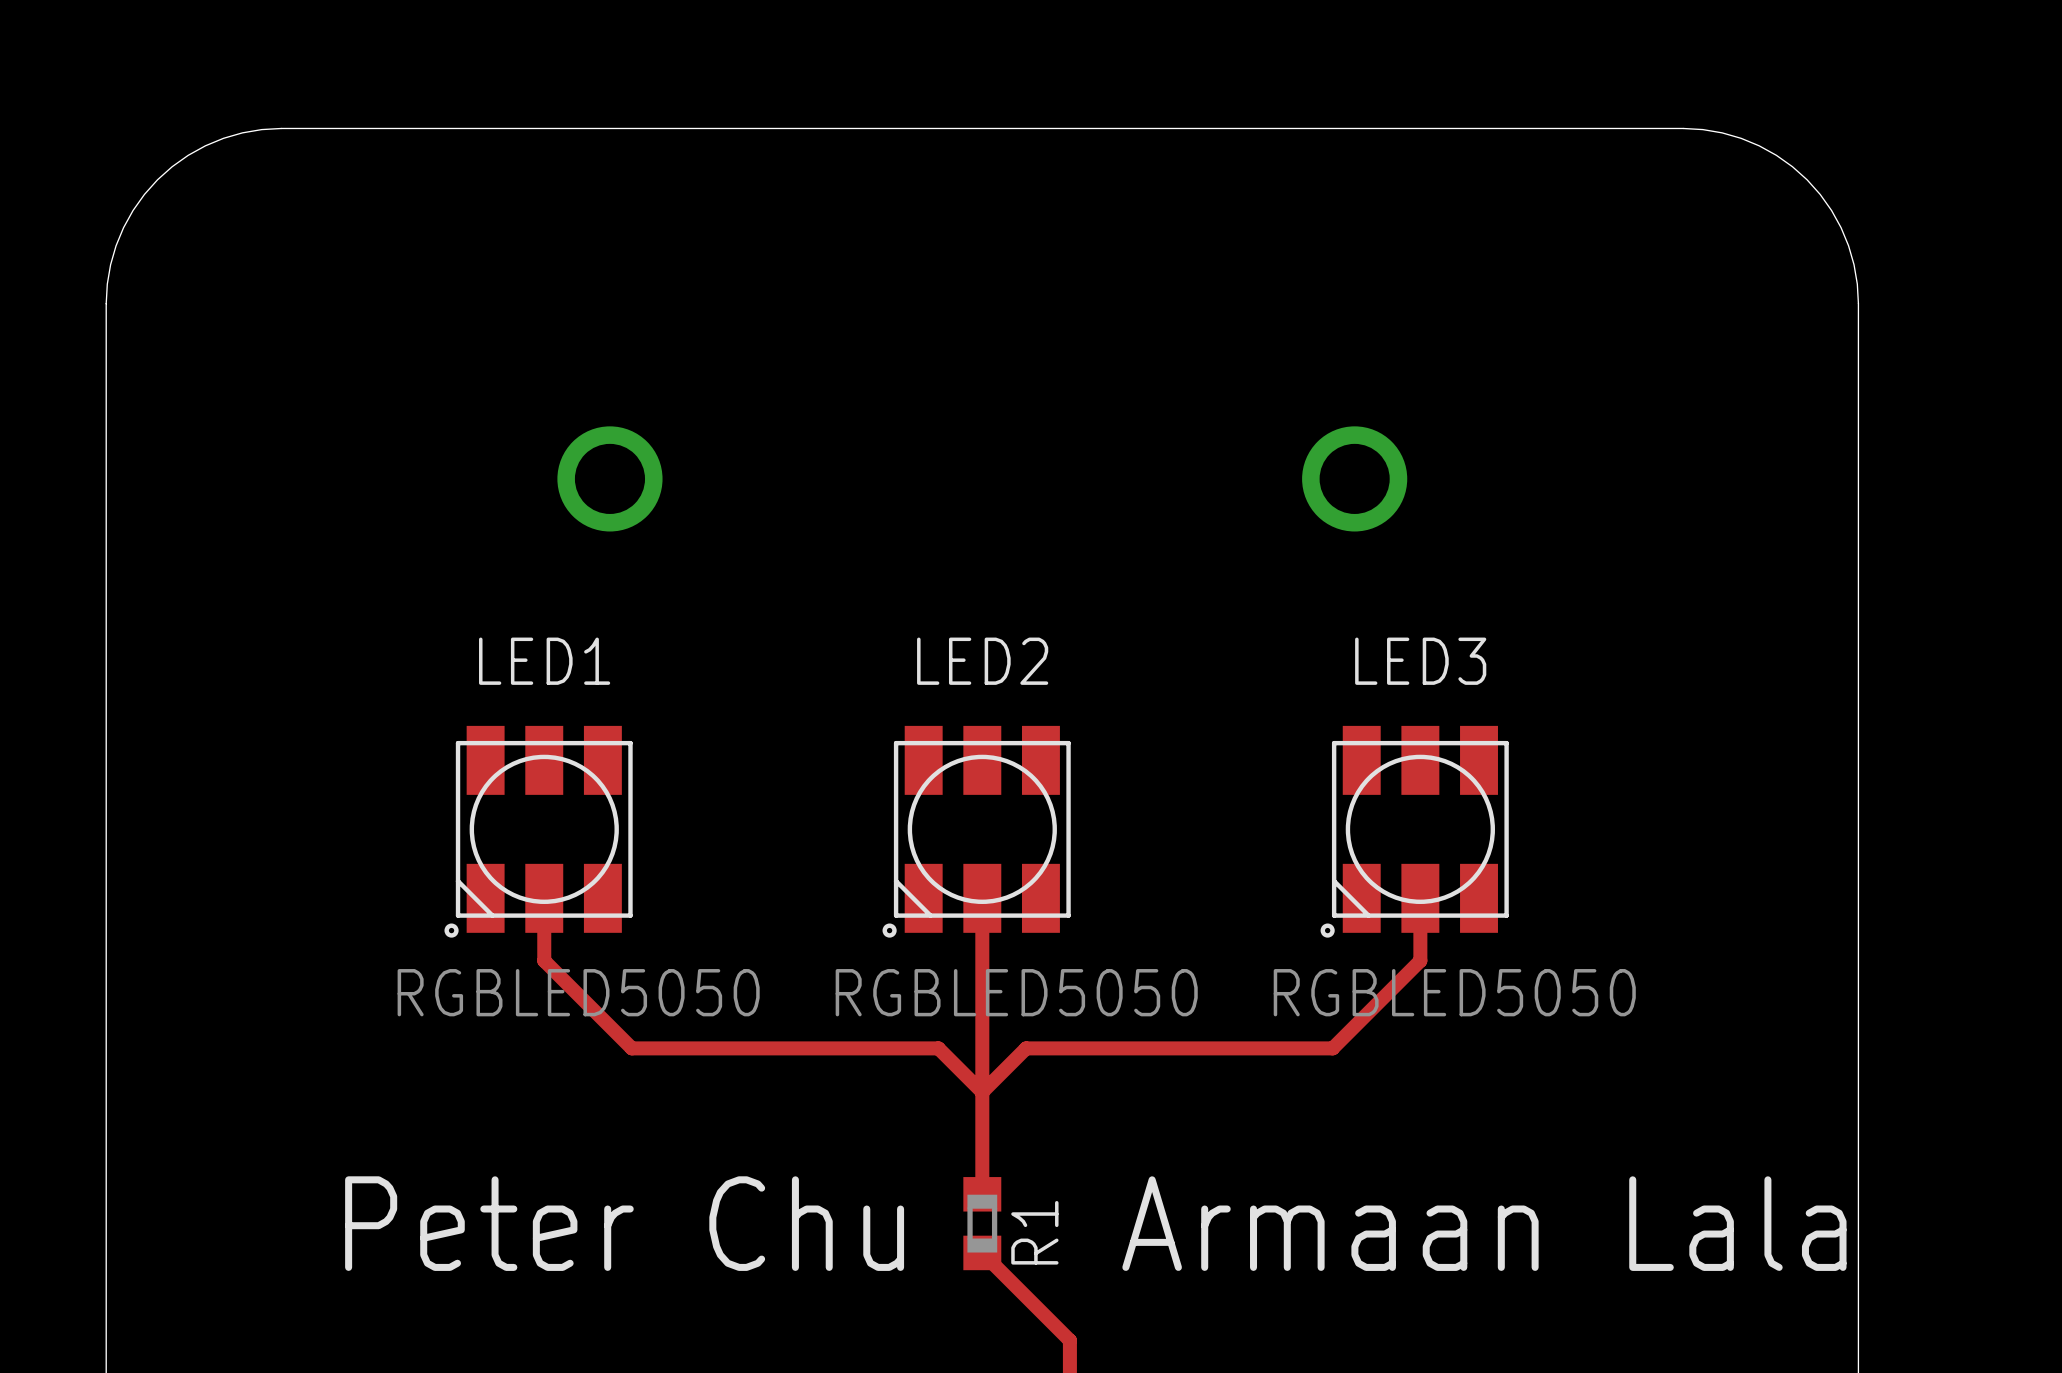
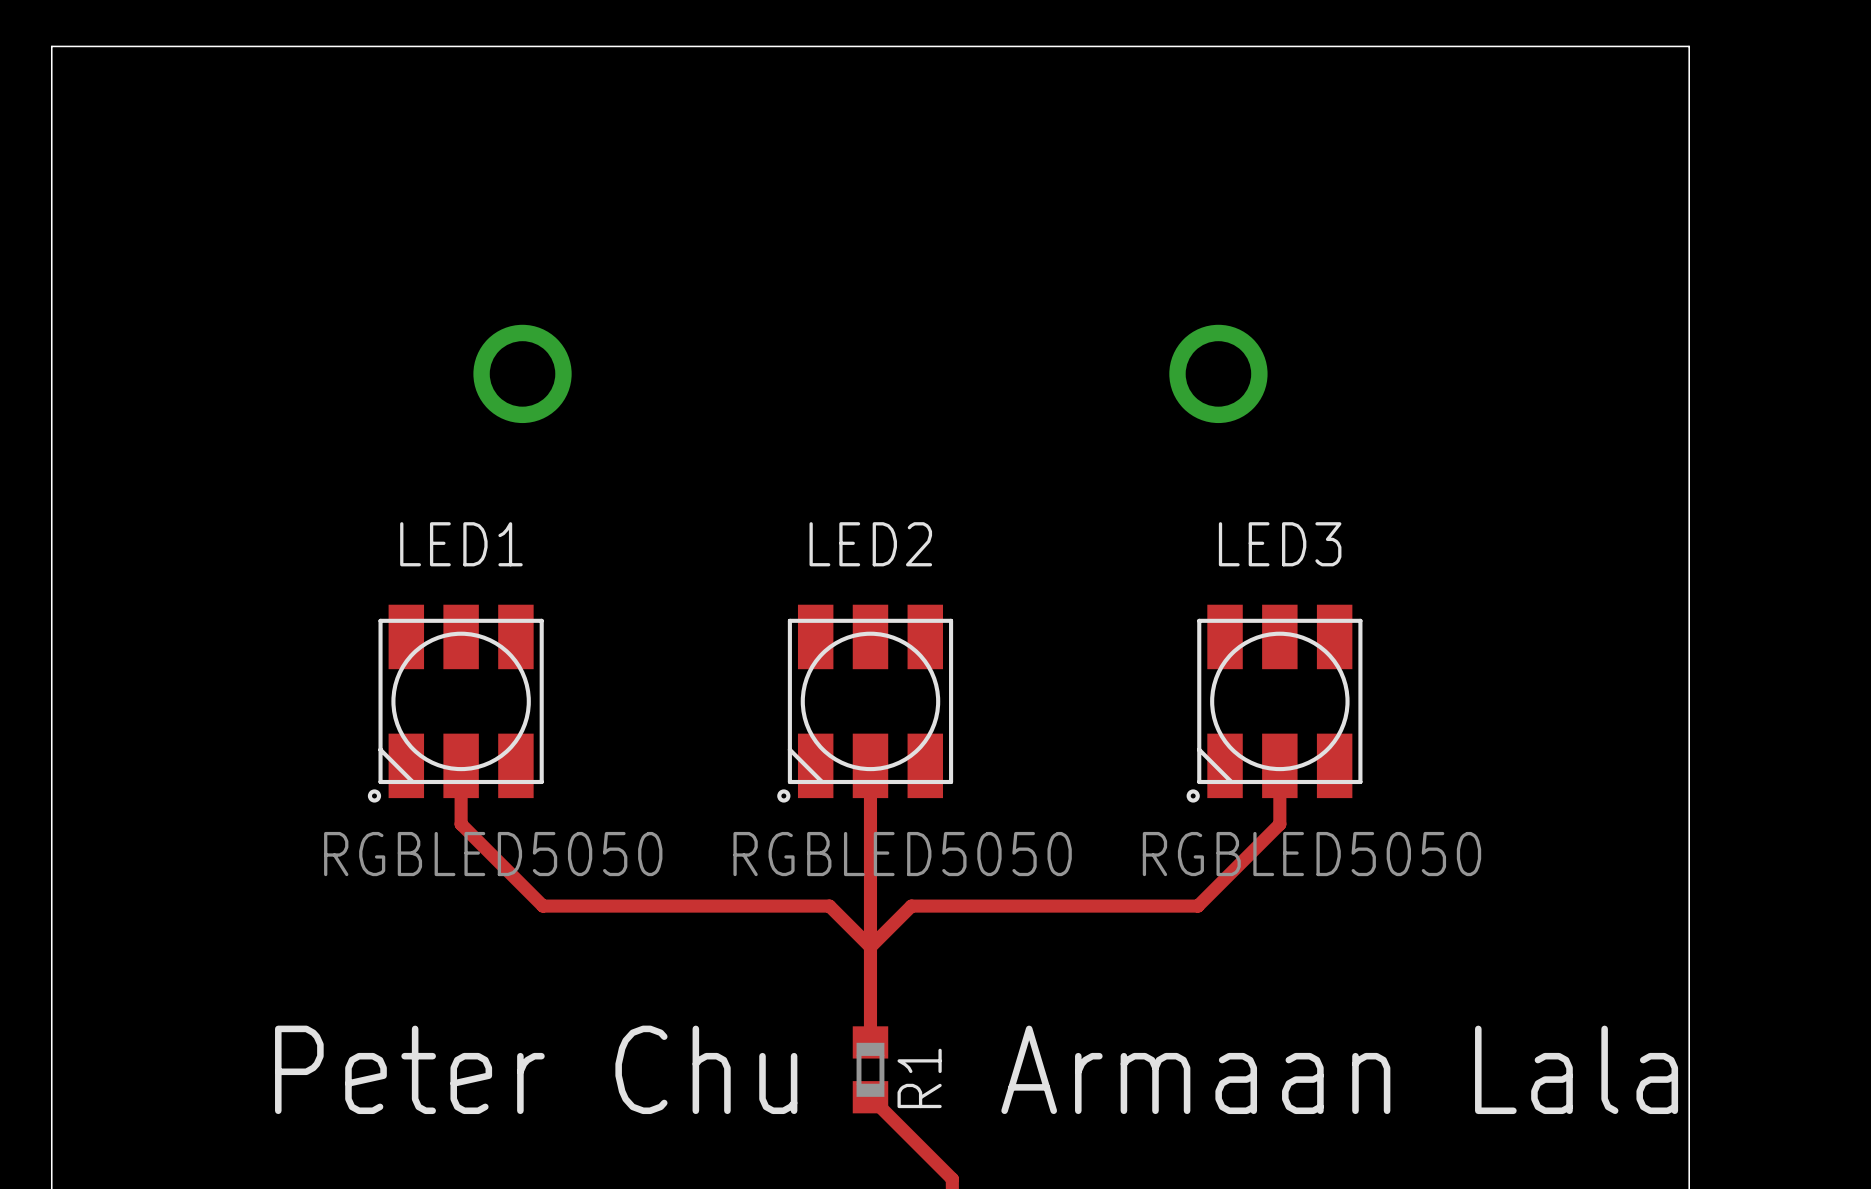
board edge: (281, 128) (242, 132) (205, 145) (188, 155) (157, 179) (133, 210) (123, 227) (110, 264) (106, 303) -> (215, 46) (51, 46) (51, 210)
board edge: (1683, 128) (1722, 132) (1759, 145) (1776, 155) (1807, 179) (1831, 210) (1841, 227) (1854, 264) (1858, 303) -> (1525, 46) (1689, 46) (1689, 210)

